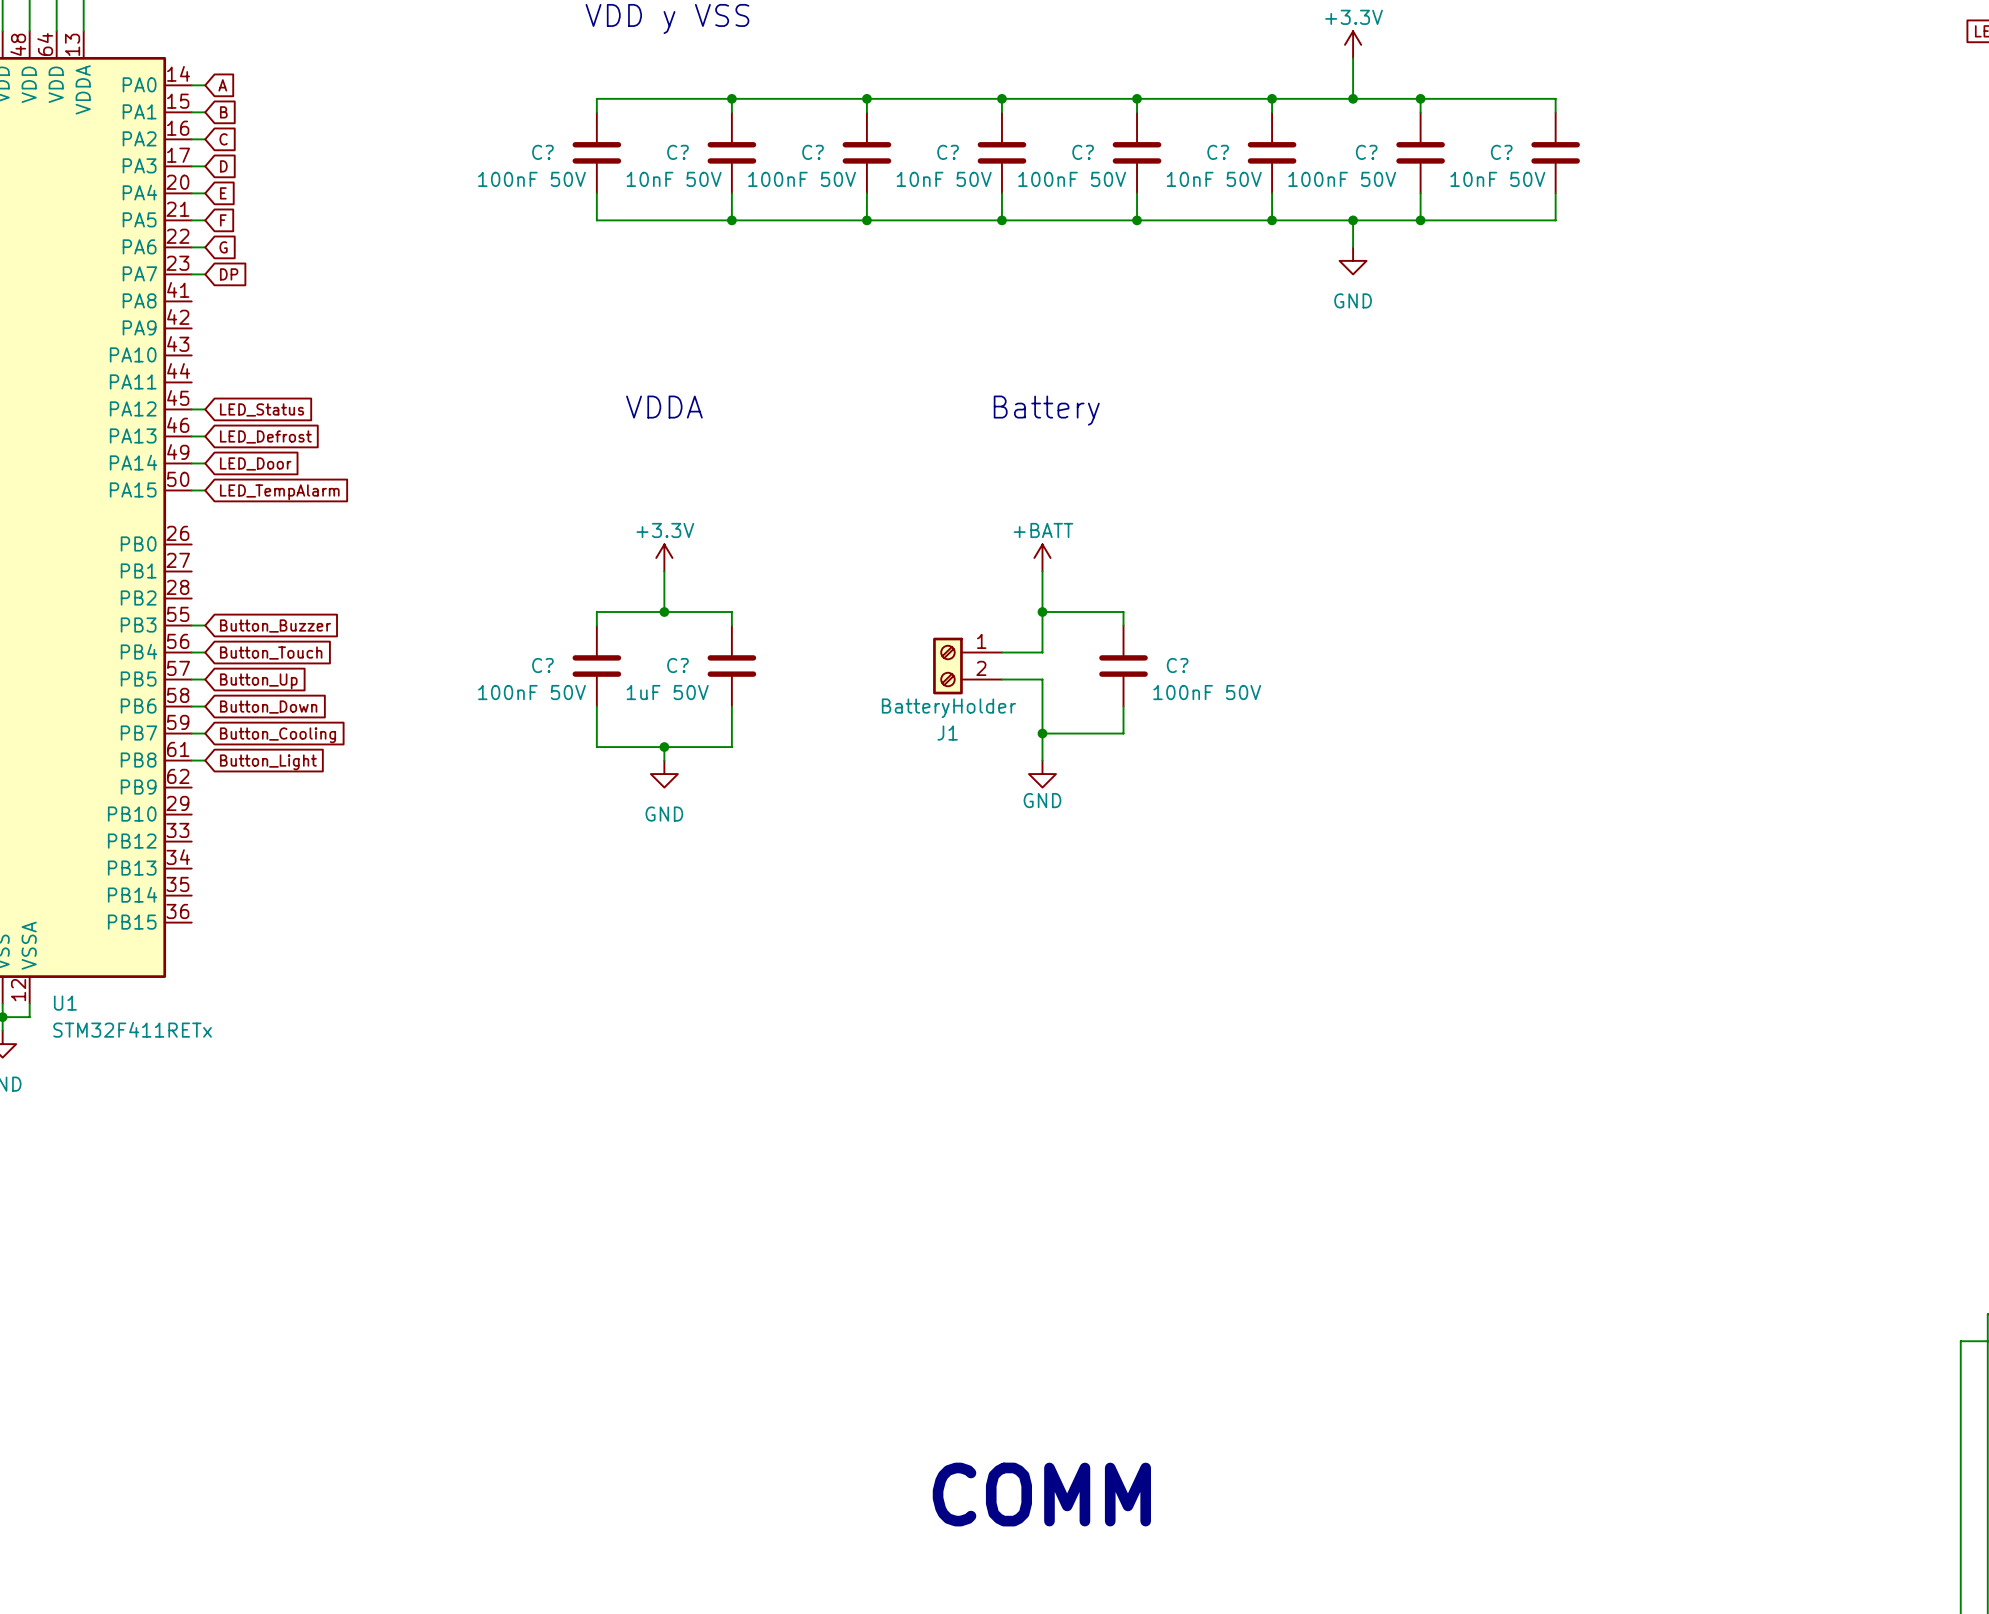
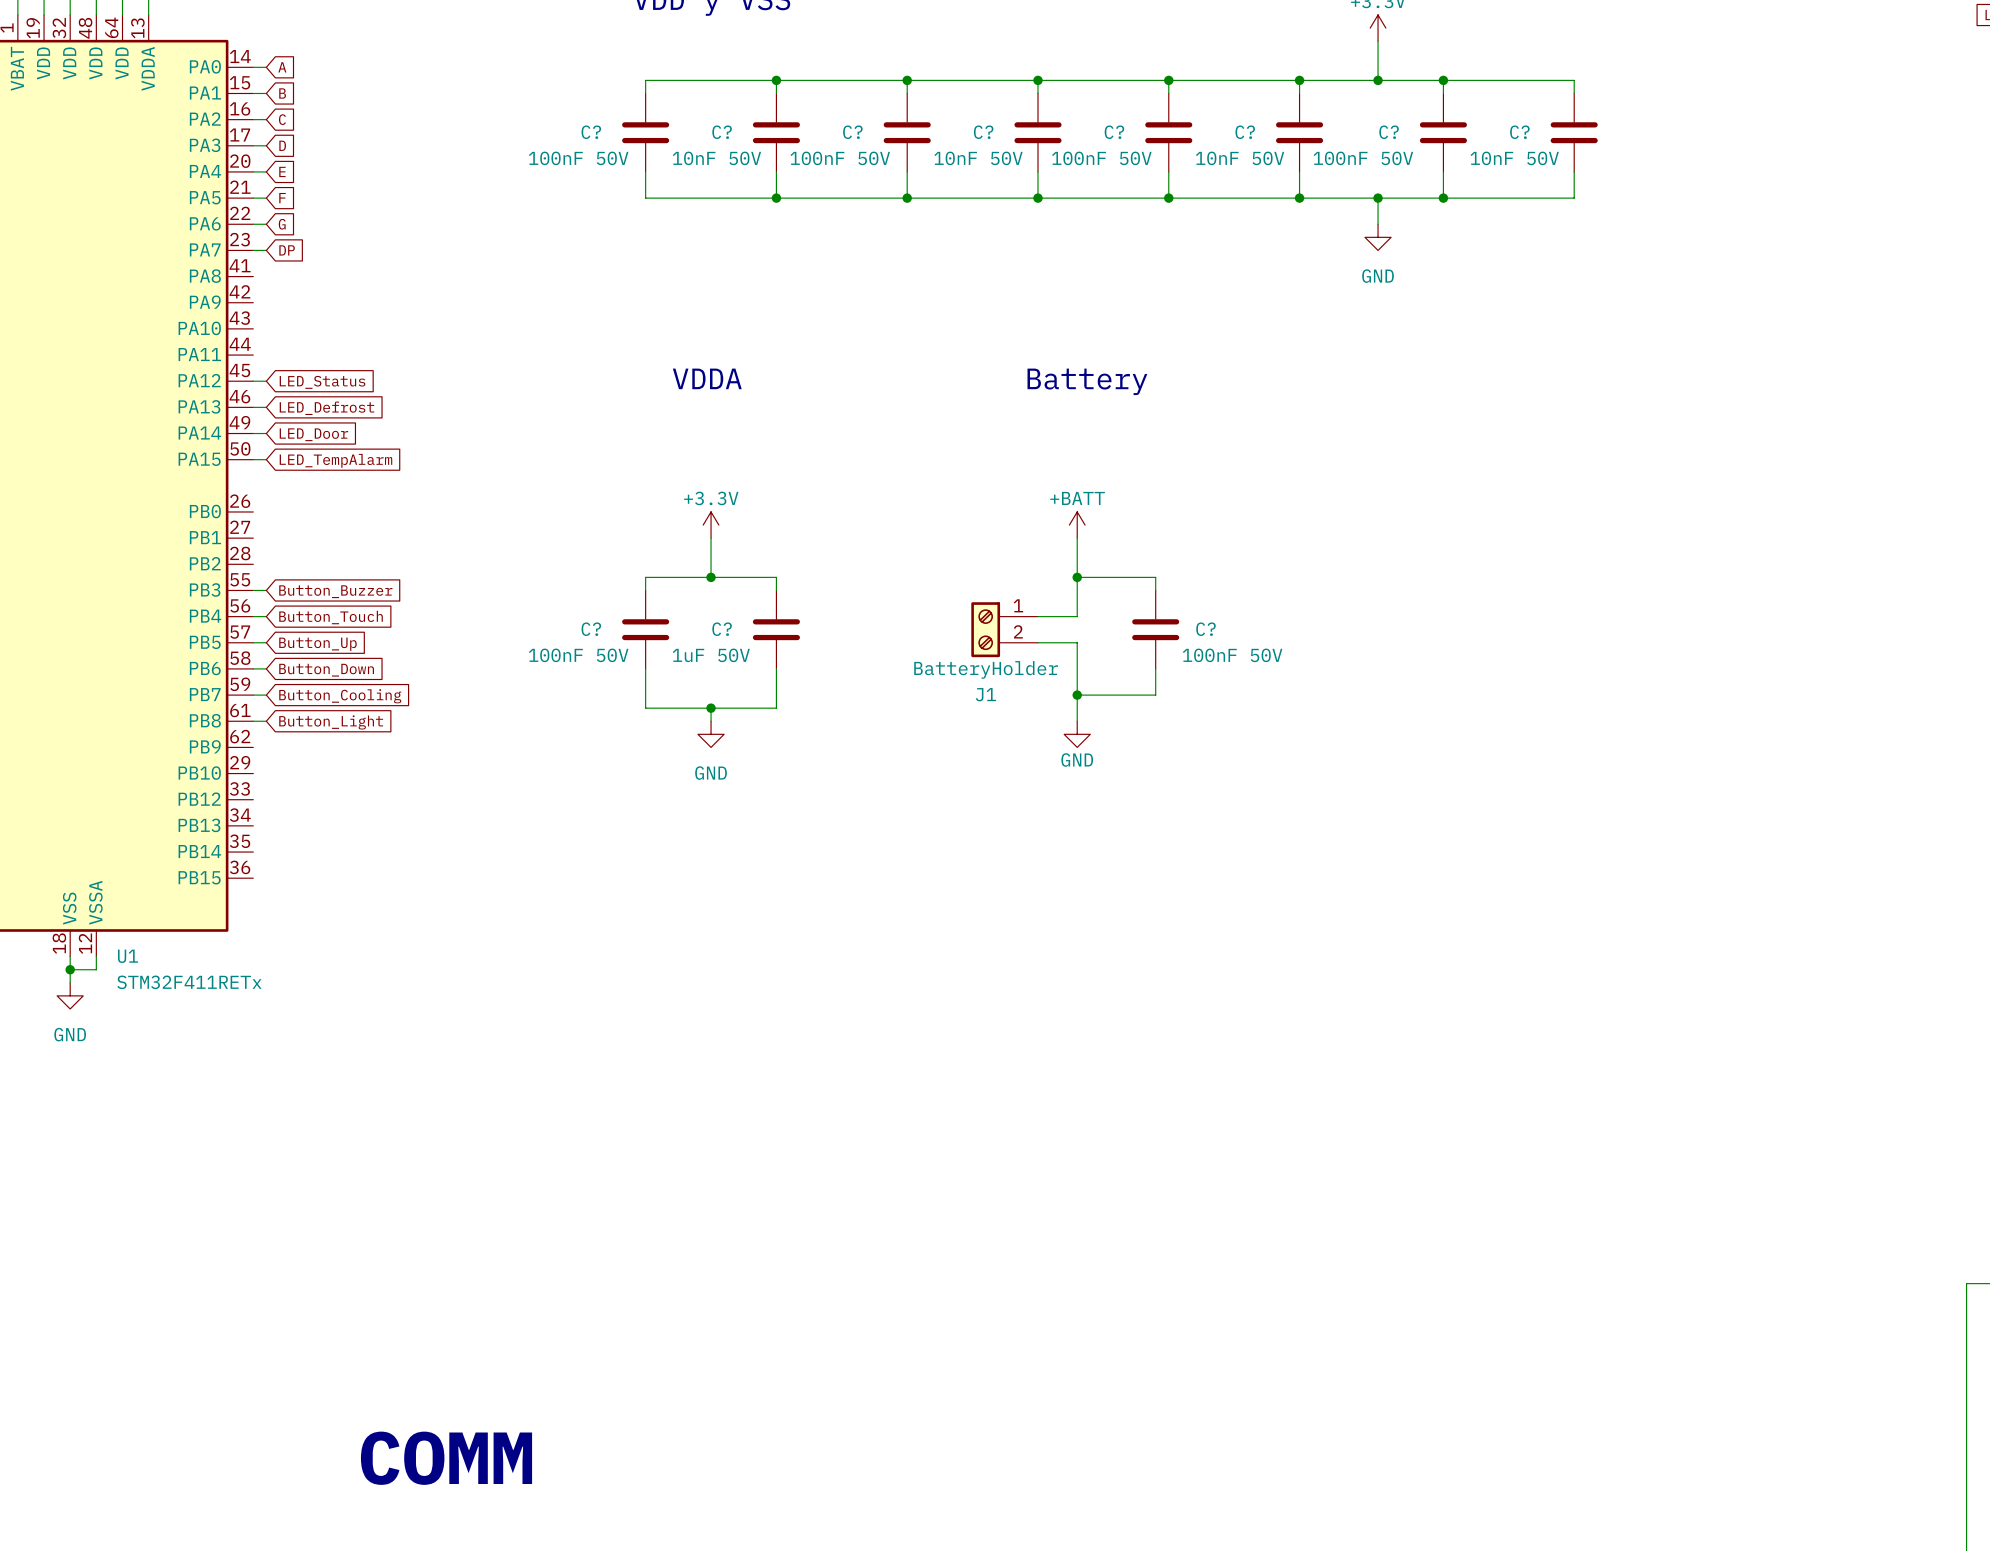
text: COMM (1041, 1494) -> none
text: none -> COMM (446, 1458)

